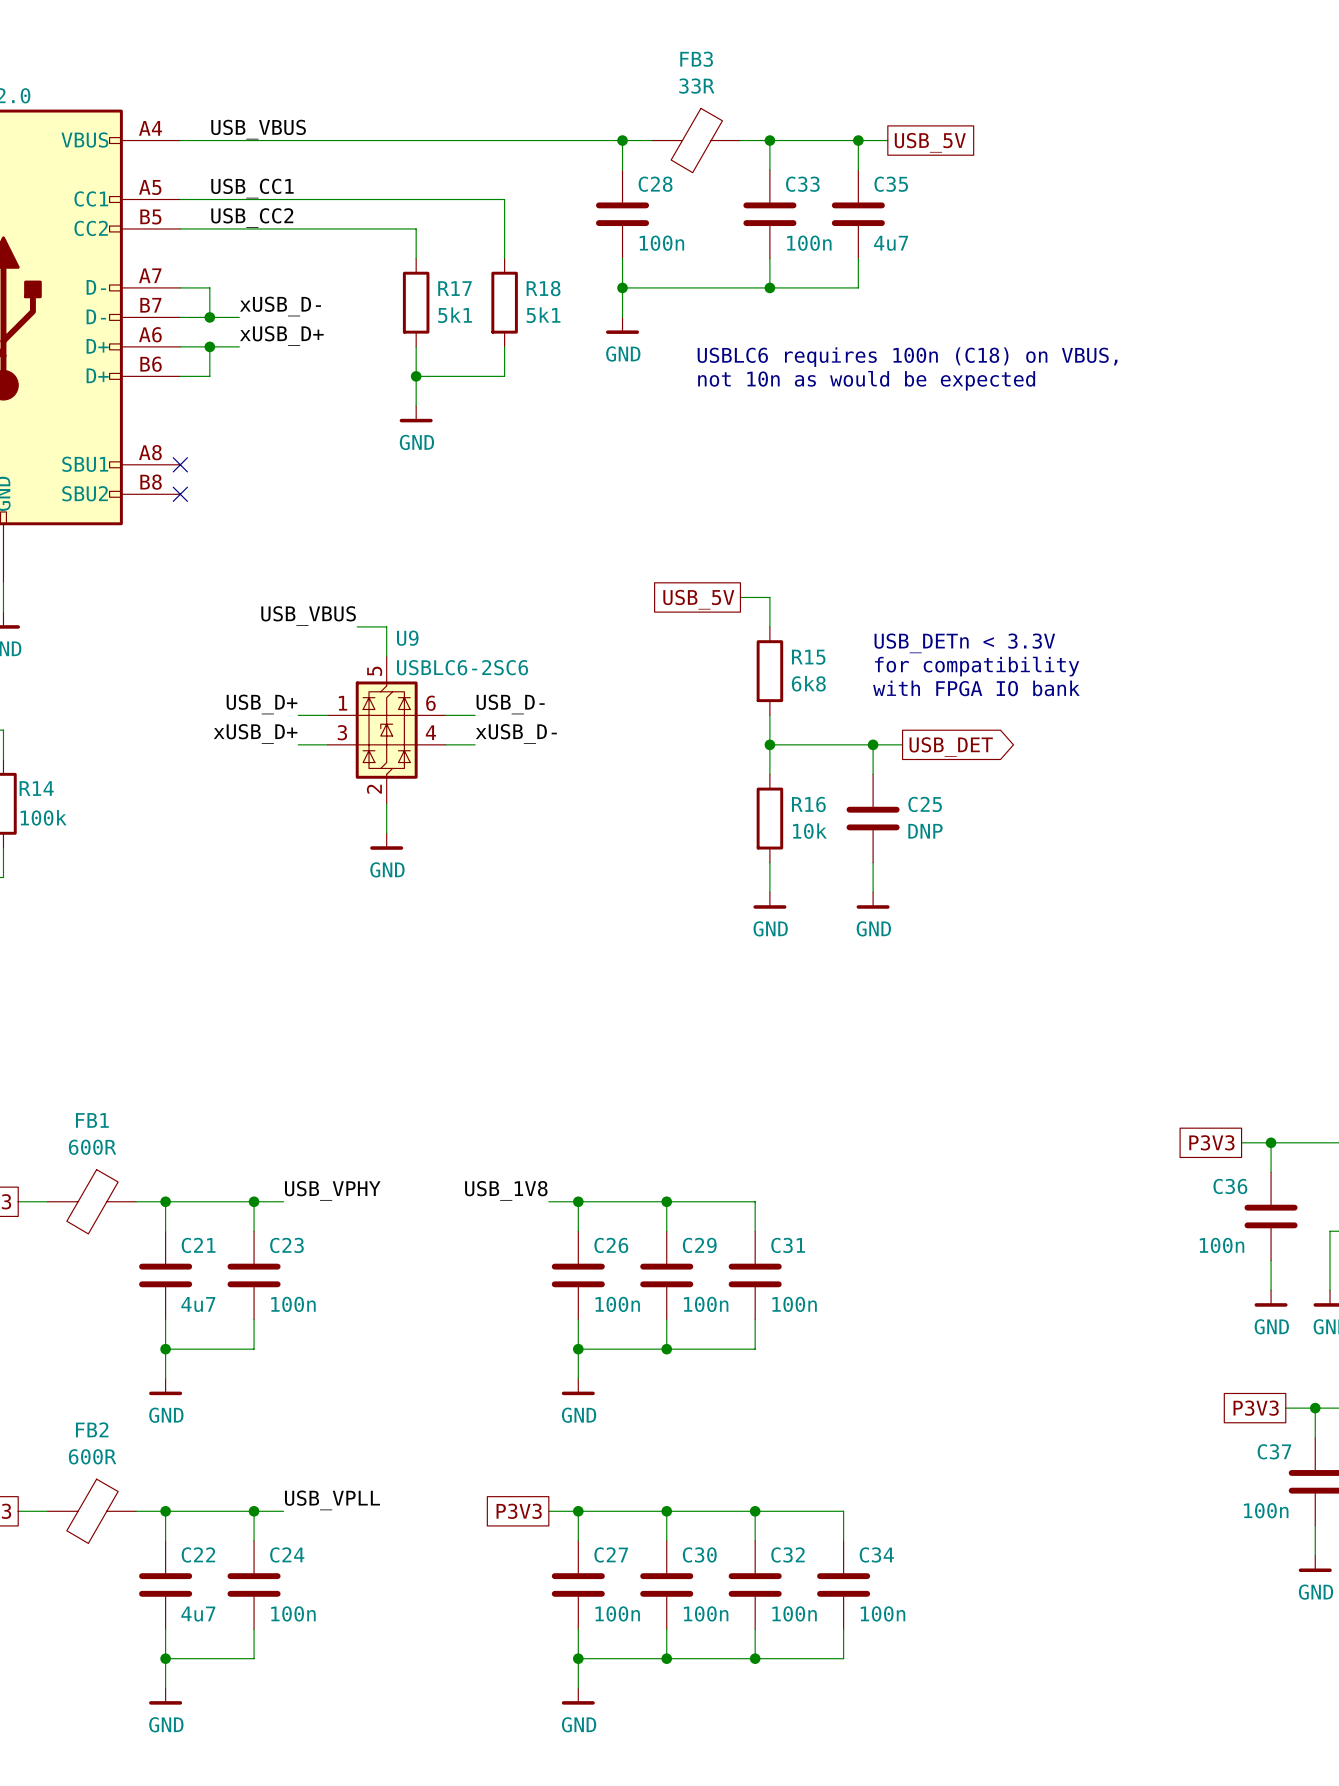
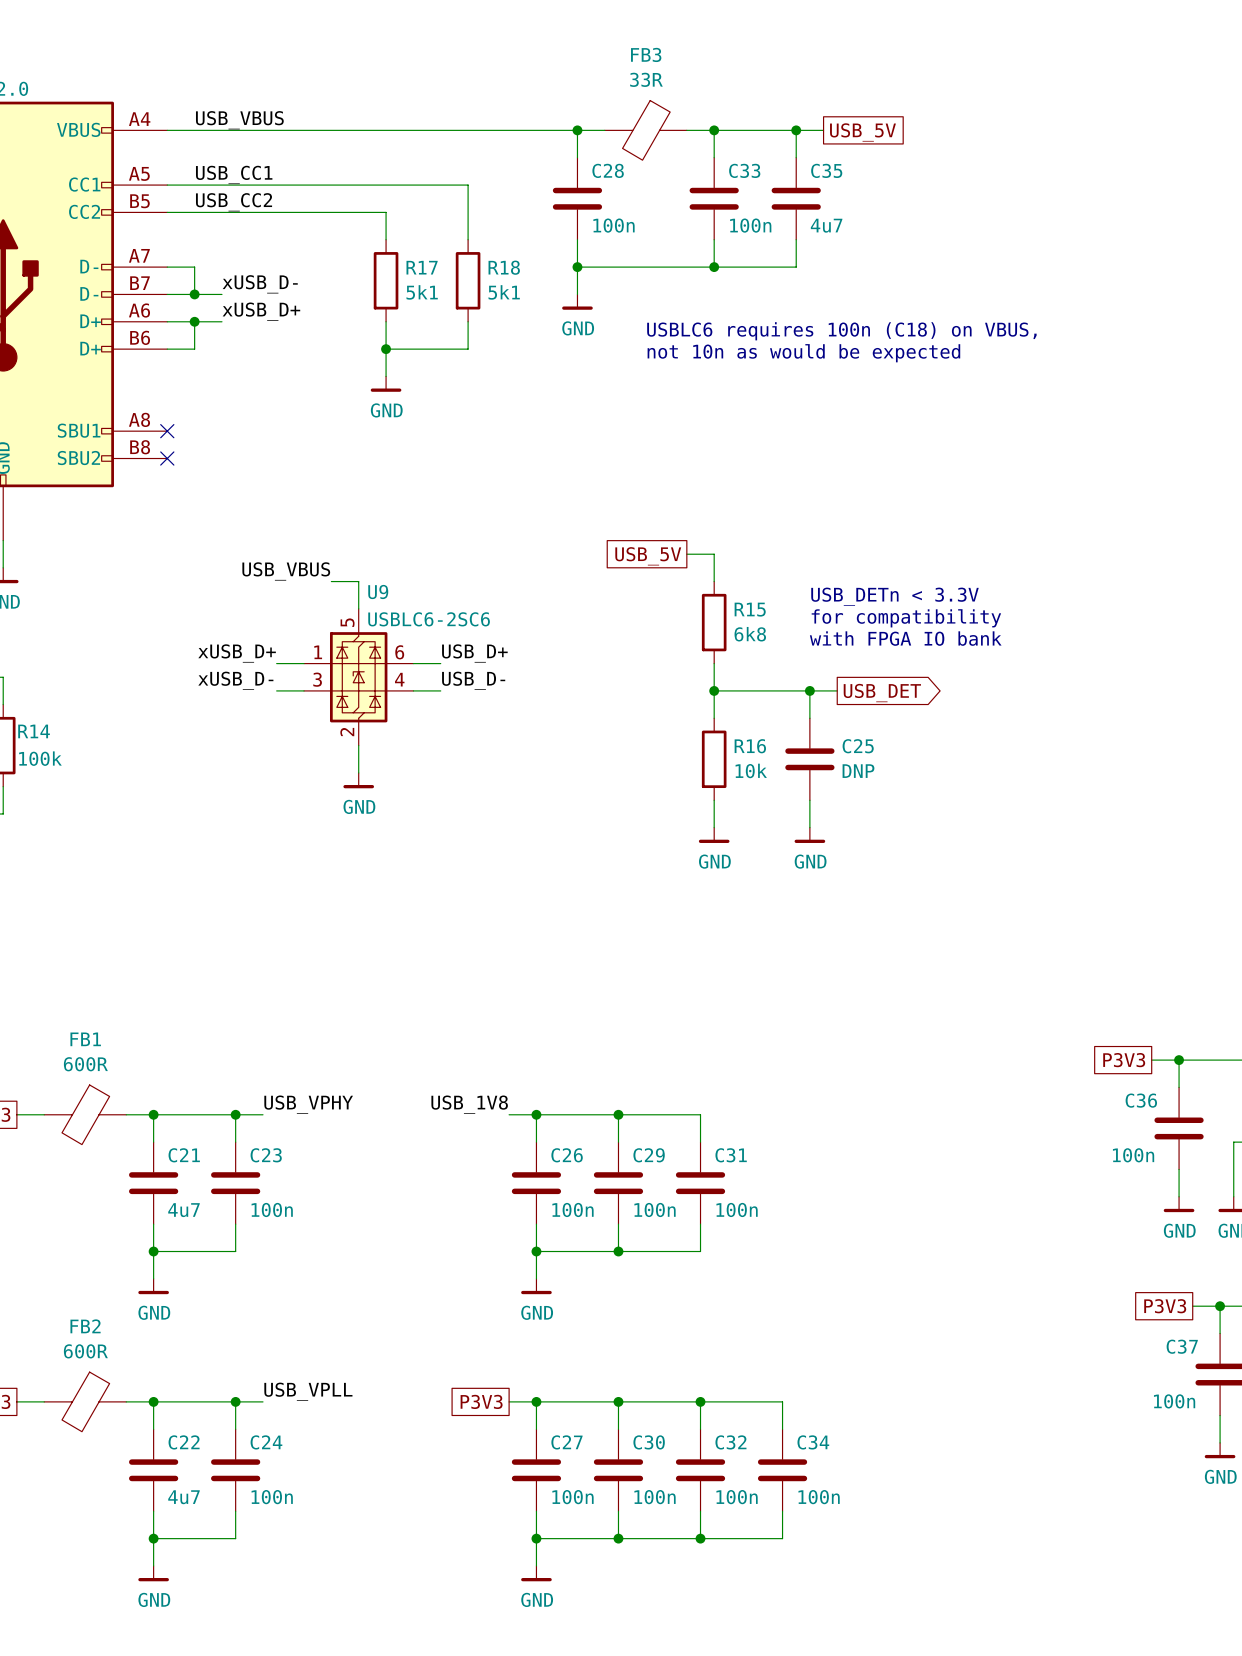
label: USB_D+ (262, 704) -> xUSB_D+ (237, 653)
label: USB_D- (510, 704) -> USB_D+ (474, 653)
label: xUSB_D+ (255, 733) -> xUSB_D- (235, 680)
label: xUSB_D- (516, 733) -> USB_D- (473, 680)

